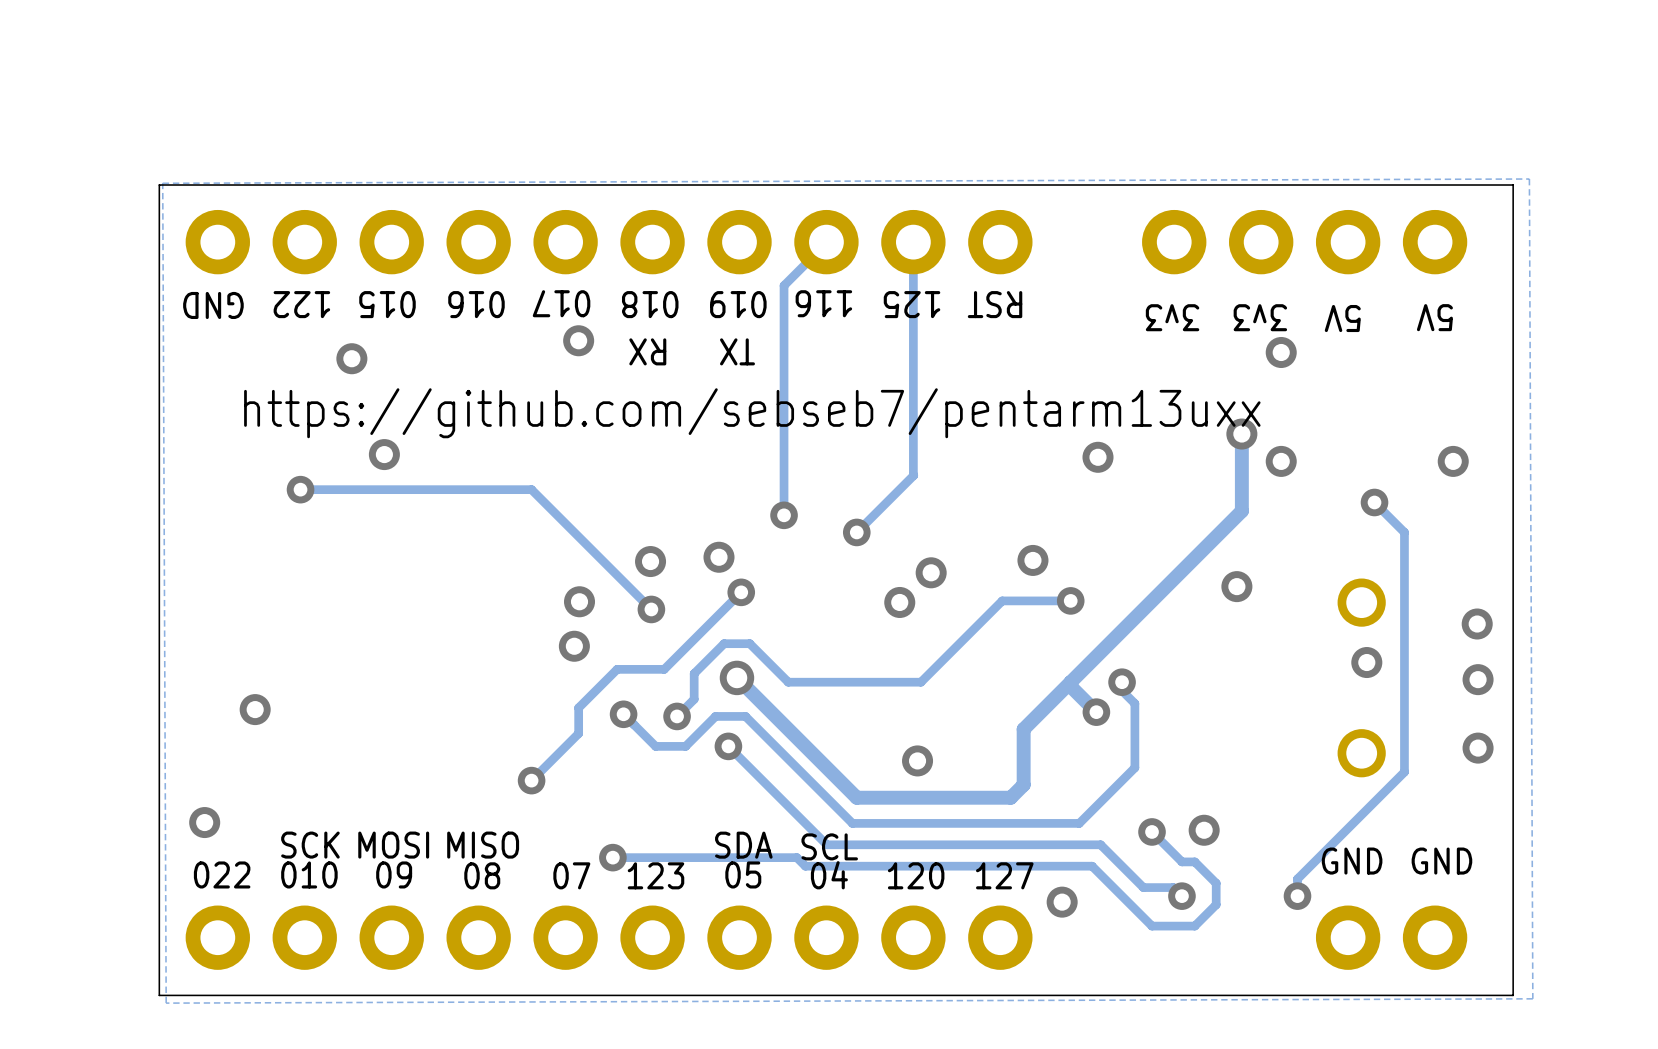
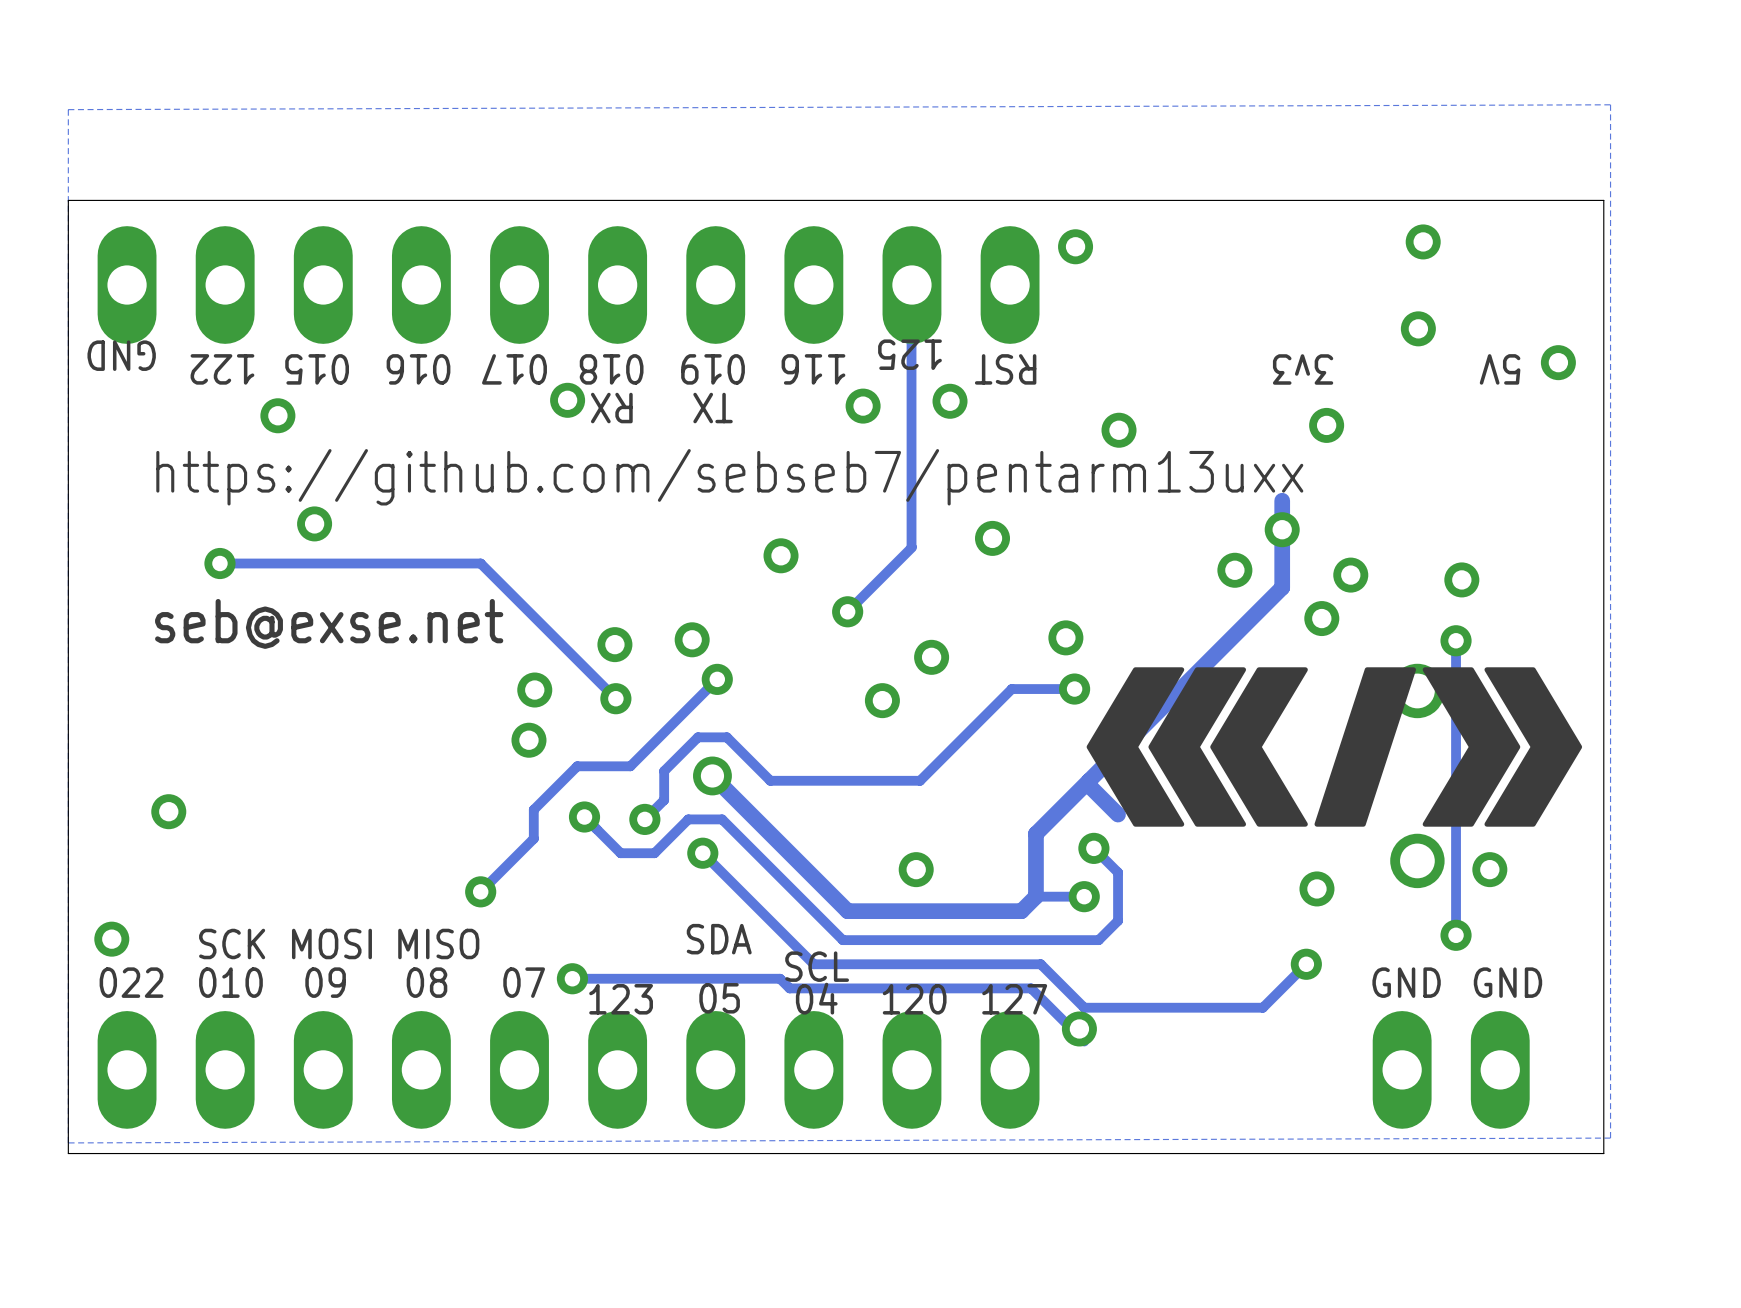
board edge: (1513, 185) (159, 185) (159, 995) (1513, 995) (1513, 185) -> (1603, 200) (1603, 1153) (68, 1153) (68, 200) (1603, 200)
via: none -> (1423, 241)
via: none -> (1075, 246)
part footprint: [185, 209, 1033, 275] -> [97, 226, 1040, 344]
track: (826, 242) (784, 285) (784, 515) -> none
part: (1217, 242) -> none
part: (1391, 242) -> none
via: none -> (1418, 328)
text position: 017 (561, 303) -> 017 (514, 369)
text position: 116 (823, 303) -> 116 (813, 369)
text position: 122 (301, 304) -> 122 (222, 369)
text position: 015 (387, 304) -> 015 (317, 369)
text position: 016 (476, 304) -> 016 (418, 369)
text position: 018 (650, 304) -> 018 (611, 369)
text position: 019 (738, 304) -> 019 (713, 369)
text position: RST (995, 304) -> RST (1005, 369)
via: none -> (1558, 362)
text: 3v3 (1172, 317) -> none
text: 5V (1342, 318) -> none
via position: (578, 340) -> (567, 400)
via: none -> (950, 401)
via: none -> (863, 406)
via position: (1281, 352) -> (1326, 425)
via: none -> (1119, 430)
via position: (1241, 434) -> (1282, 529)
via: (1098, 457) -> none
via: (1281, 461) -> none
via: (1453, 461) -> none
via: none -> (992, 538)
via: none -> (781, 555)
via: none -> (1234, 570)
via: none -> (1350, 575)
track: (1374, 502) (1404, 532) (1404, 772) (1297, 879) (1297, 896) -> none
via position: (1374, 502) -> (1456, 640)
via: none -> (1461, 579)
via: (784, 515) -> none
via: none -> (1321, 618)
text: none -> seb@exse.net (329, 623)
track: none -> (1456, 640) (1456, 935)
via position: (1032, 560) -> (1065, 637)
drawing: none -> [1086, 667, 1583, 827]
via: (1236, 586) -> none
via position: (1070, 600) -> (1074, 689)
via position: (899, 602) -> (882, 700)
via: (1477, 624) -> none
via: (1366, 662) -> none
via: (1478, 679) -> none
track: (1122, 682) (1122, 690) (1134, 703) (1134, 767) (1096, 806) -> (1093, 848) (1118, 872) (1118, 920)
via: (1122, 682) -> none
via position: (1096, 712) -> (1093, 848)
via: (1478, 748) -> none
via: none -> (1489, 869)
via: none -> (1316, 888)
track: none -> (1084, 896) (1035, 896)
via: none -> (1084, 896)
via: none -> (1456, 935)
via: (1204, 830) -> none
track: (1152, 831) (1181, 861) (1194, 861) (1216, 883) (1216, 904) (1194, 926) (1152, 926) (1092, 866) (1019, 866) -> (1084, 1041) (1031, 988)
via: (1152, 831) -> none
track: (1027, 844) (1100, 844) (1143, 887) (1173, 887) (1181, 896) -> (1040, 964) (1084, 1007) (1262, 1007) (1306, 964)
via: none -> (1306, 964)
text position: SCK (310, 845) -> SCK (232, 943)
text position: MOSI (393, 845) -> MOSI (331, 943)
text position: MISO (483, 845) -> MISO (438, 943)
text position: SDA (743, 845) -> SDA (719, 939)
text position: 022 (222, 874) -> 022 (131, 982)
text position: 010 (309, 874) -> 010 (230, 982)
text position: 09 (394, 874) -> 09 (325, 982)
text position: 08 (482, 875) -> 08 (426, 982)
text position: 07 (571, 875) -> 07 (524, 982)
via: (1181, 896) -> none
via: (1297, 896) -> none
part footprint: [185, 905, 1033, 970] -> [97, 1011, 1040, 1129]
part footprint: [1315, 905, 1468, 970] -> [1372, 1011, 1530, 1129]
zone outline: (1532, 998) (1529, 179) (162, 183) (166, 1003) -> (1610, 1138) (1610, 104) (68, 109) (68, 1142)

